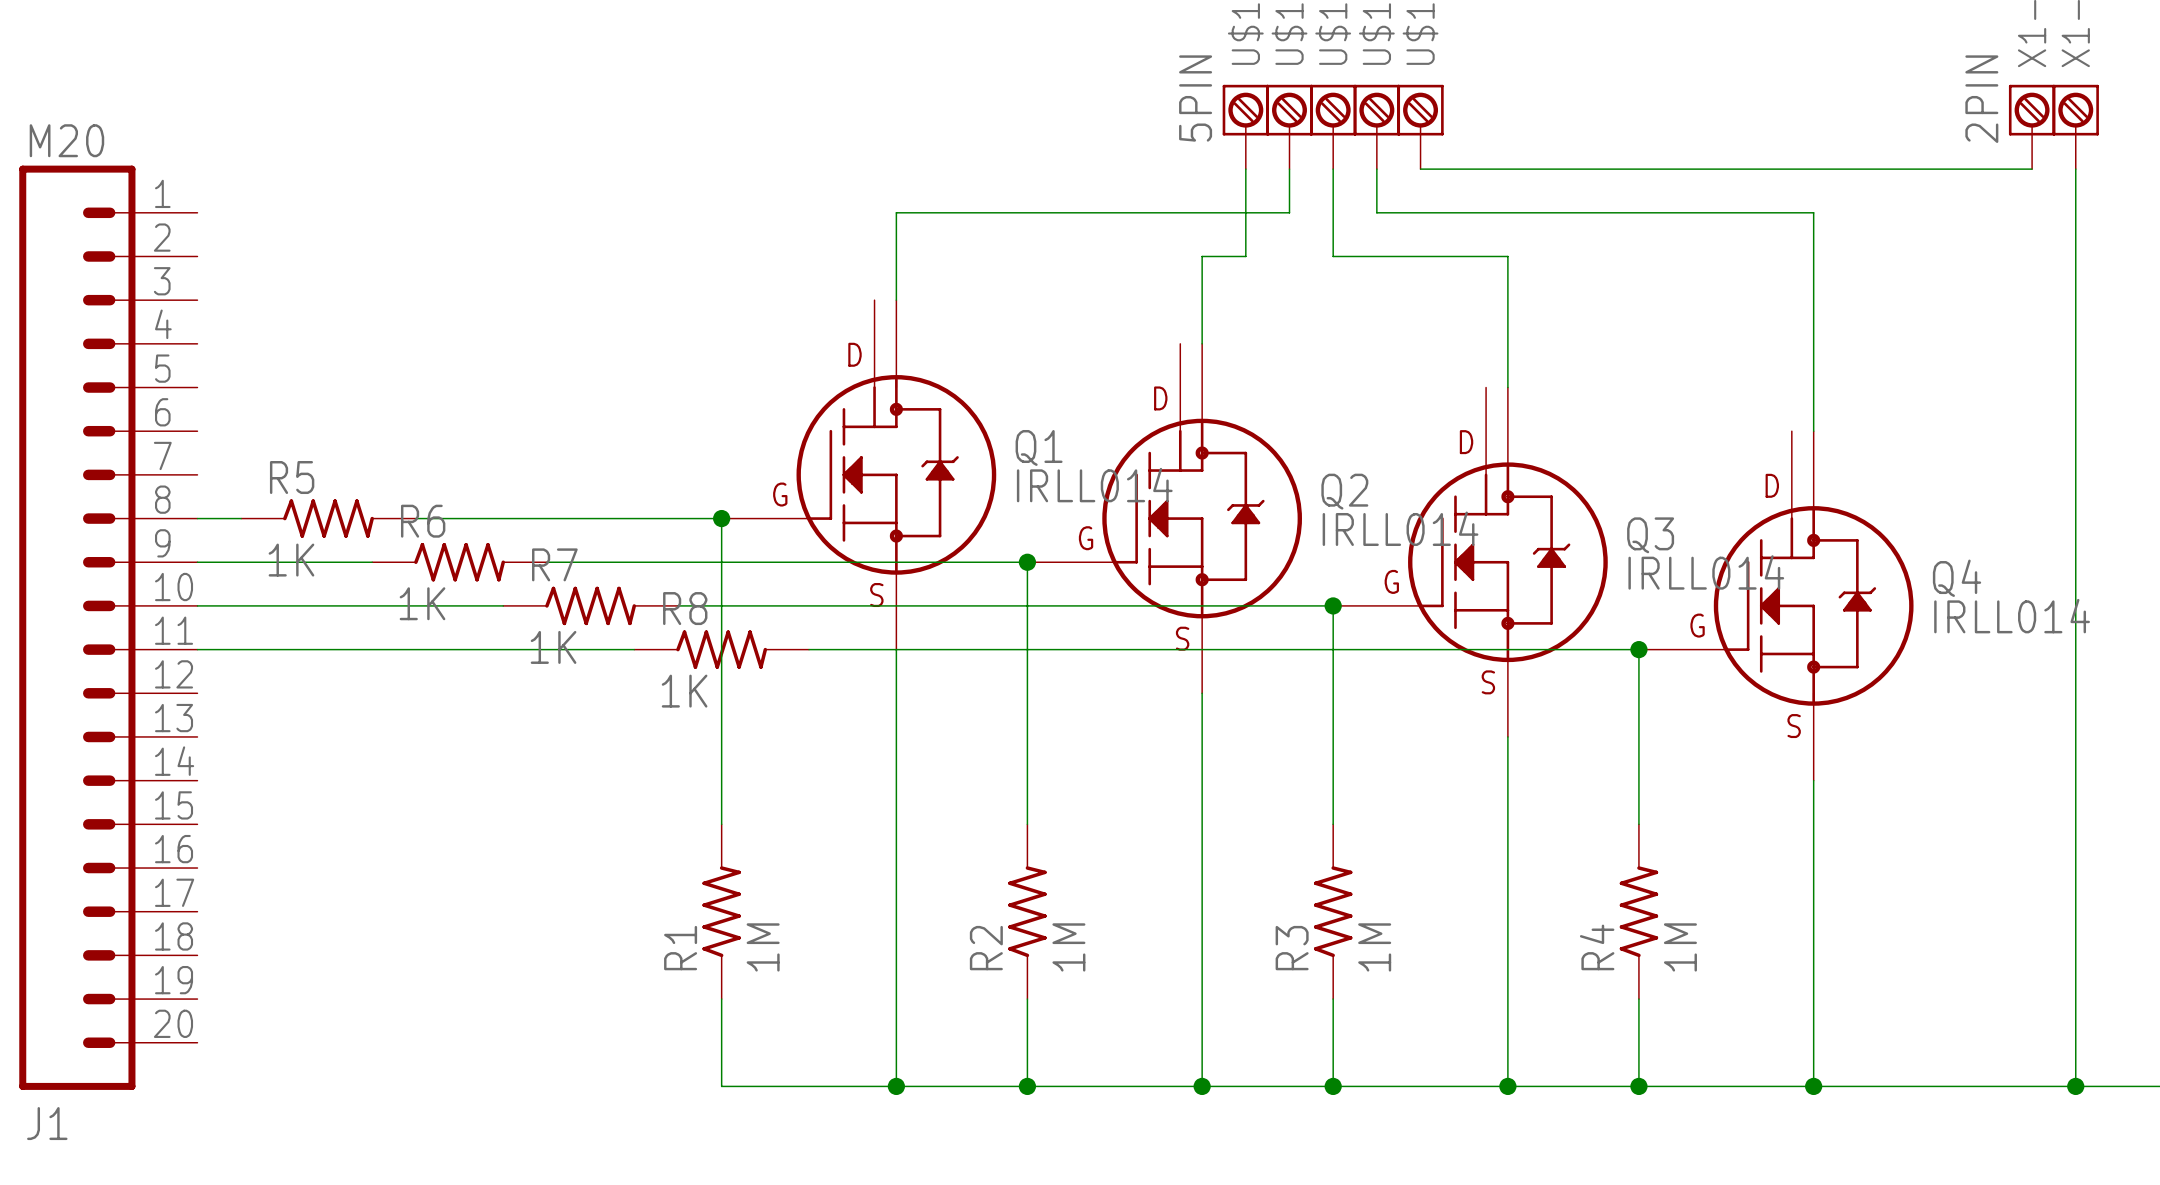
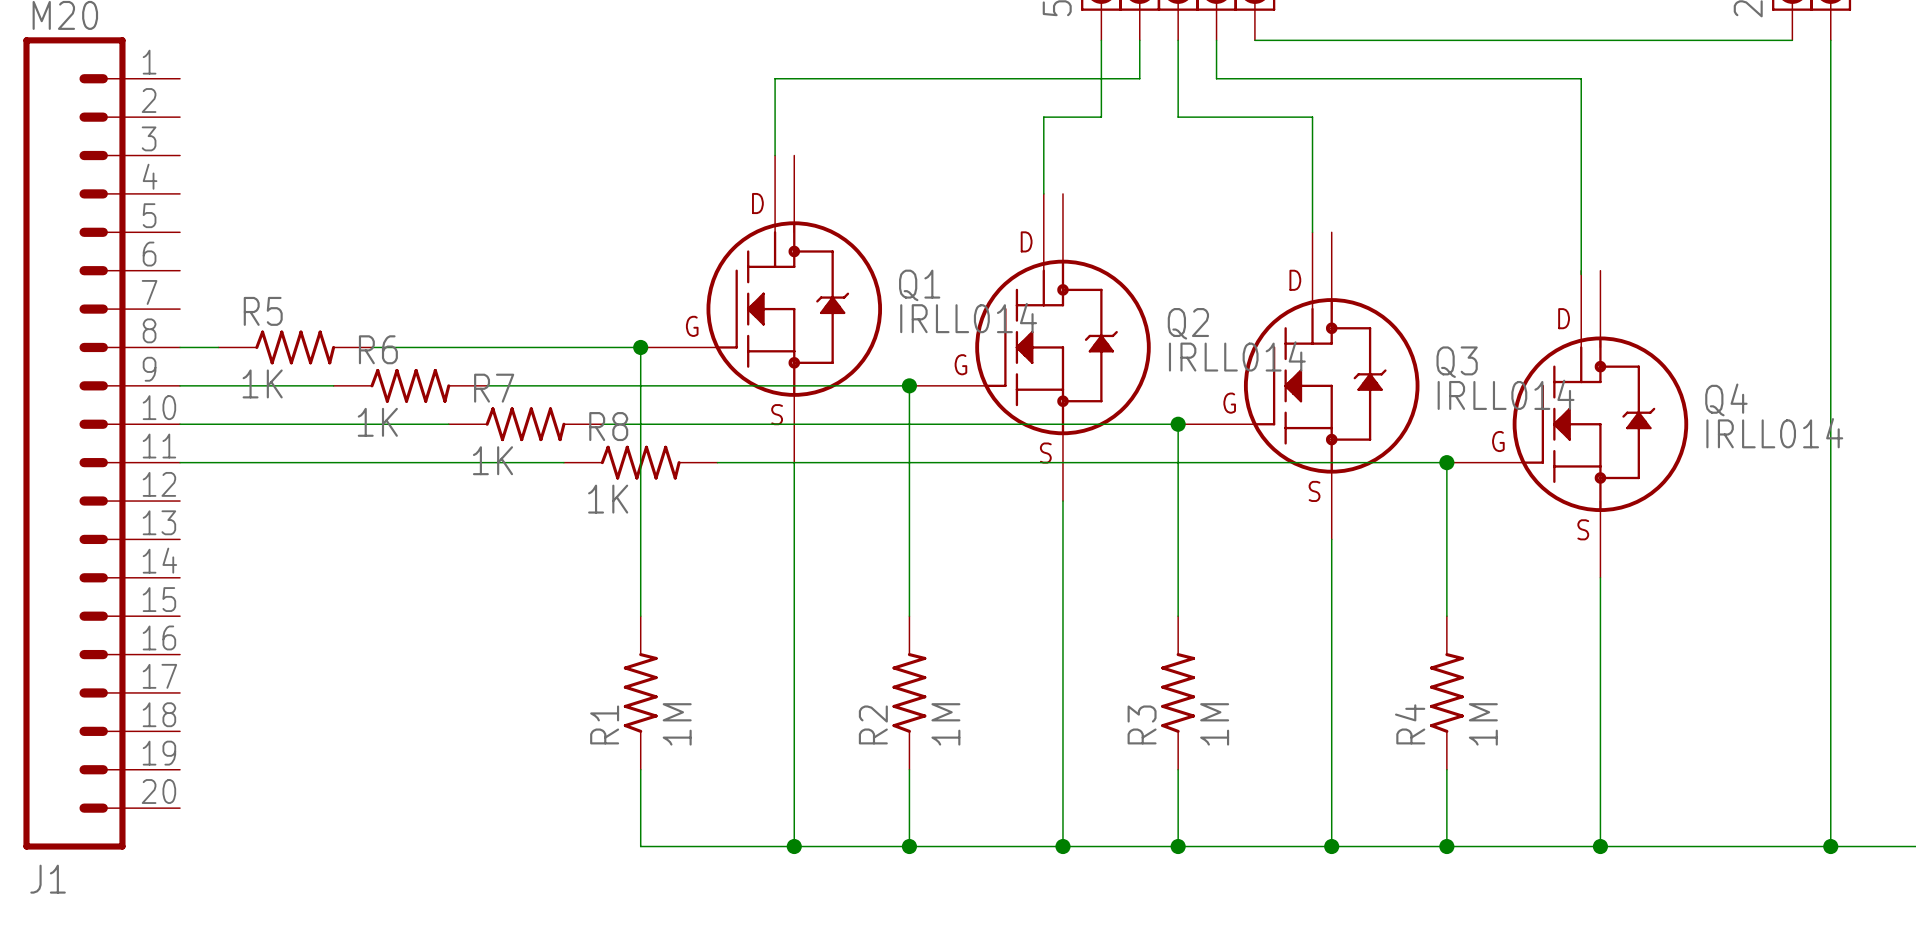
wire: (896, 212) (896, 300) -> (794, 78) (775, 78) (775, 155)
wire: (1791, 212) (1813, 212) (1813, 431) -> (1581, 78) (1581, 274)
wire: (1202, 256) (1202, 343) -> (1062, 117) (1043, 117) (1043, 193)
wire: (1486, 256) (1507, 256) (1507, 387) -> (1312, 117) (1312, 232)

